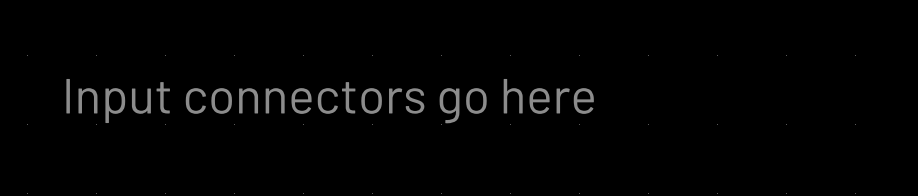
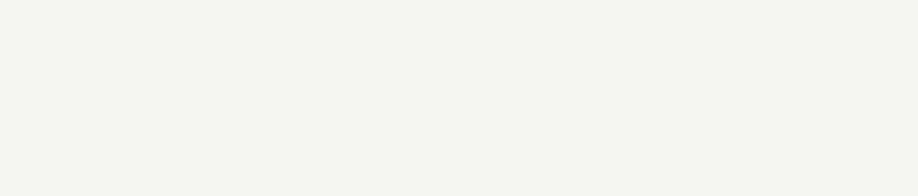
text: Input connectors go here (330, 101) -> none

